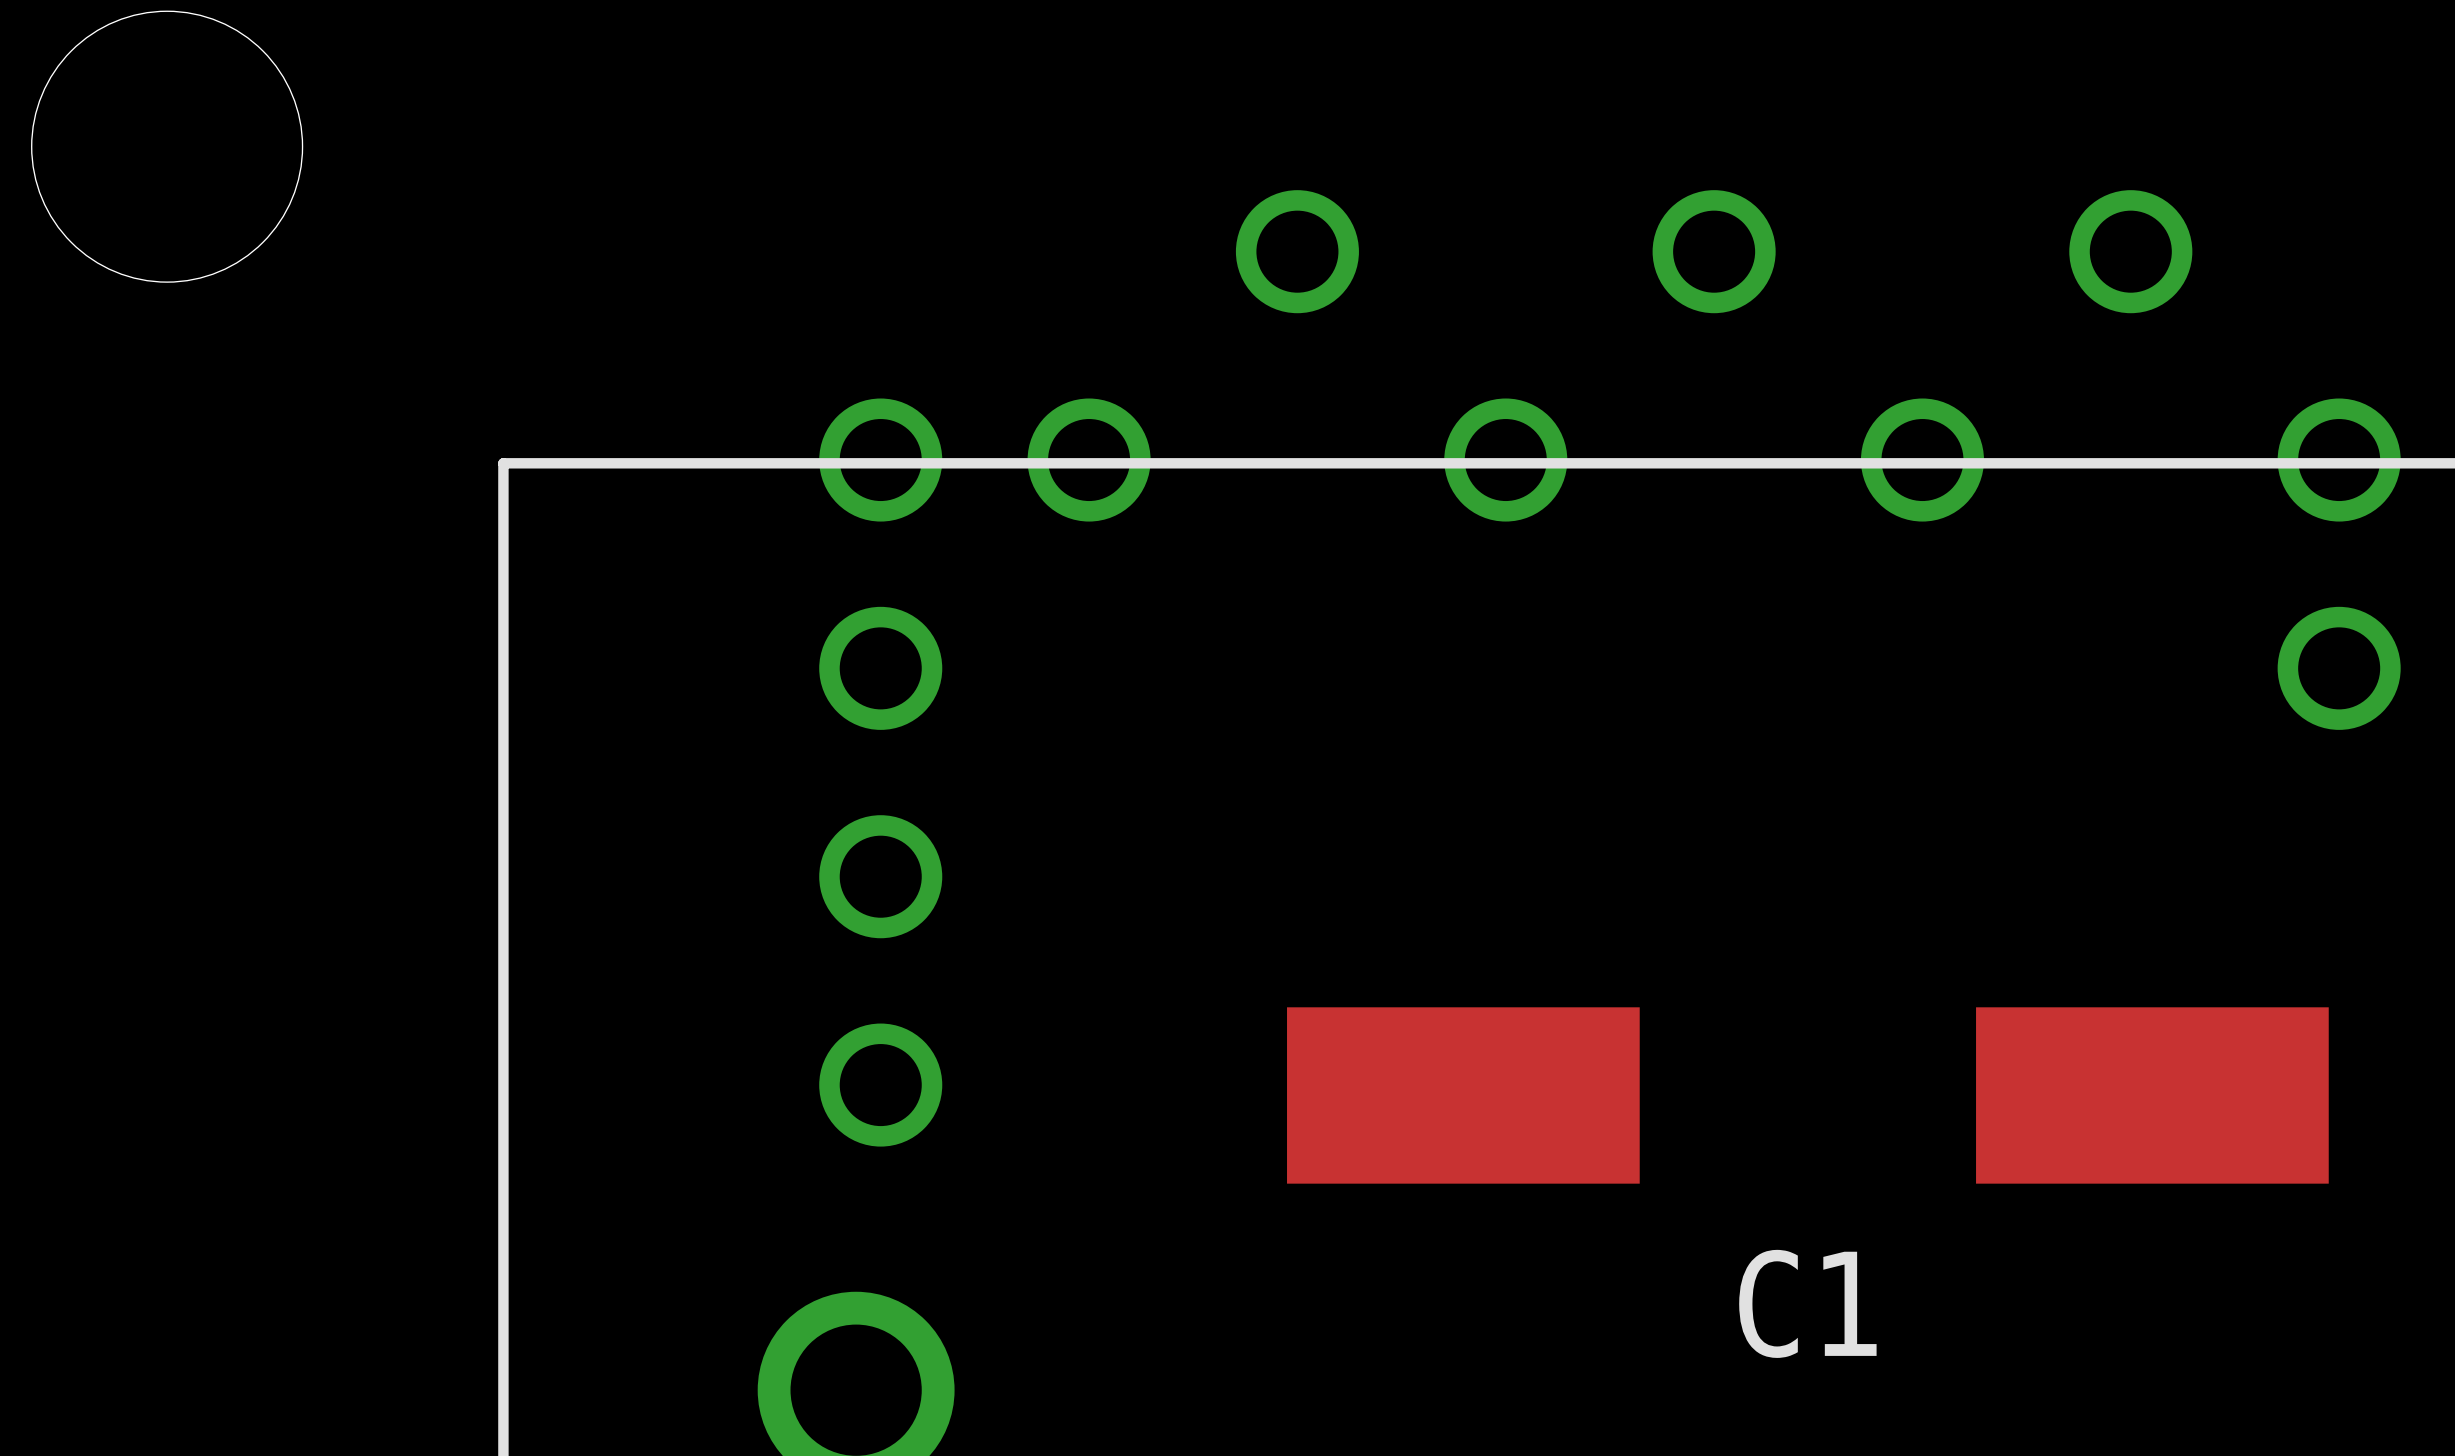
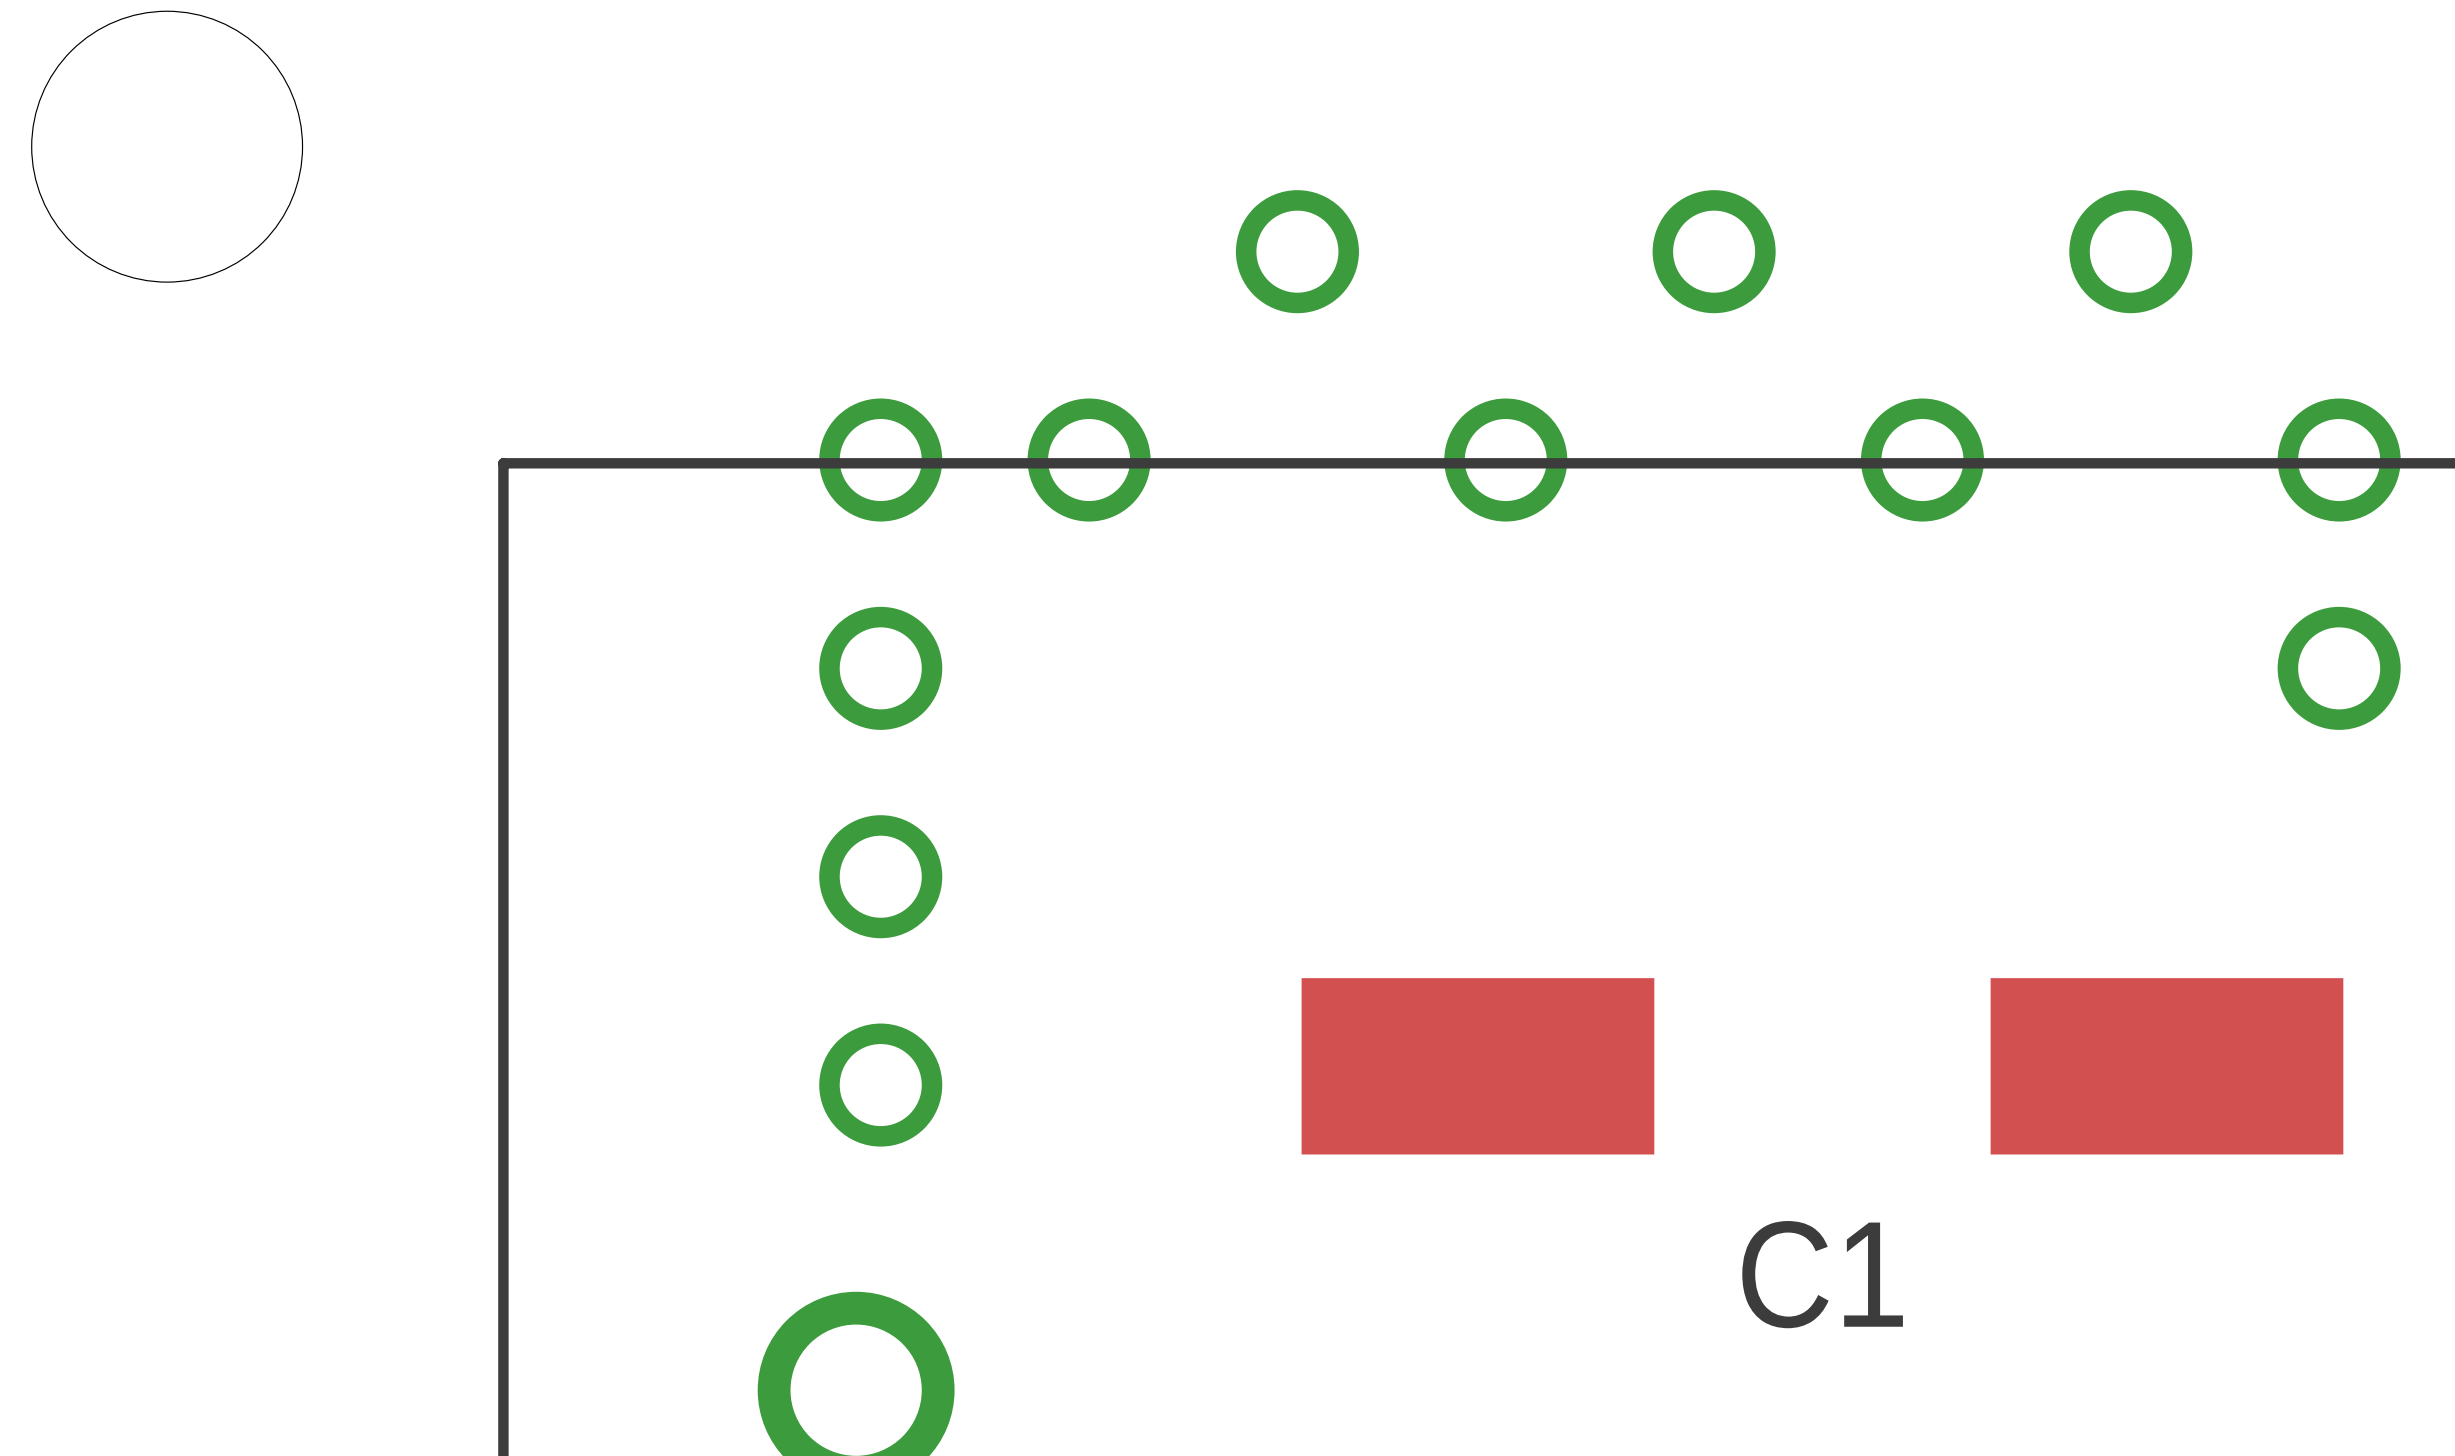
C1 position: (1807, 1095) -> (1822, 1066)

